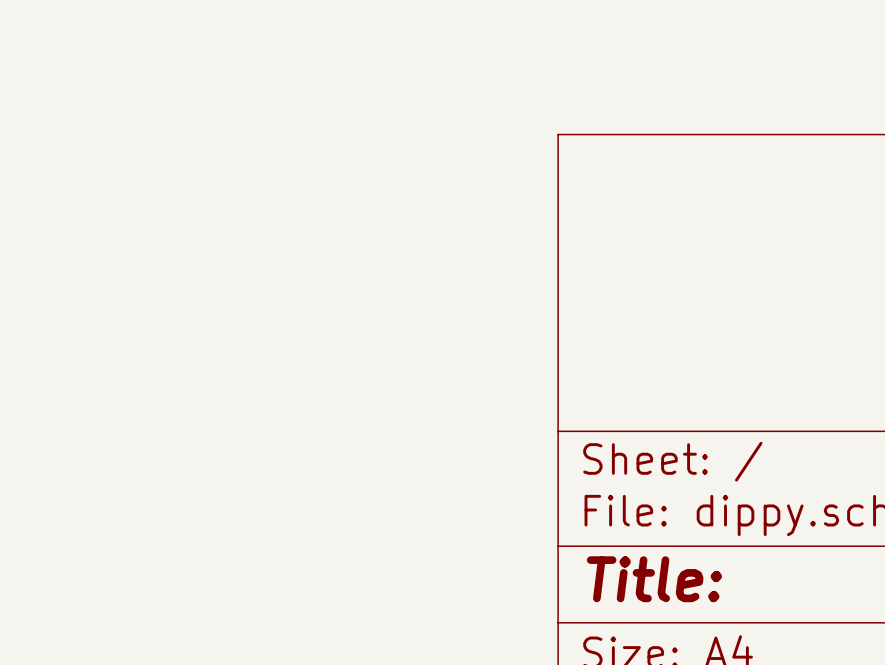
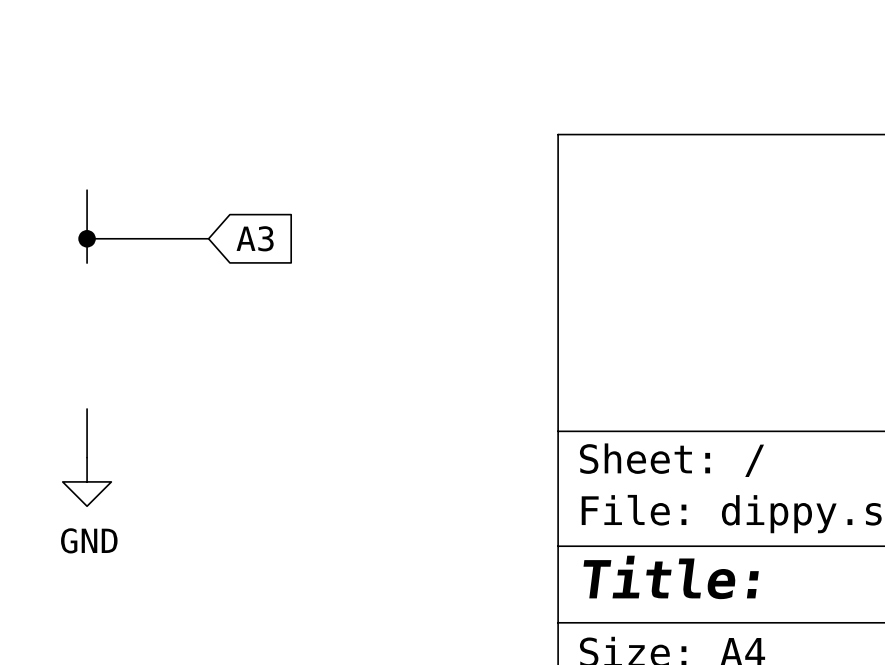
wire: none -> (87, 190) (87, 263)
wire: none -> (87, 238) (208, 238)
junction: none -> (87, 238)
global label: none -> A3 (255, 238)
wire: none -> (87, 408) (87, 457)
power symbol: none -> GND (87, 481)

